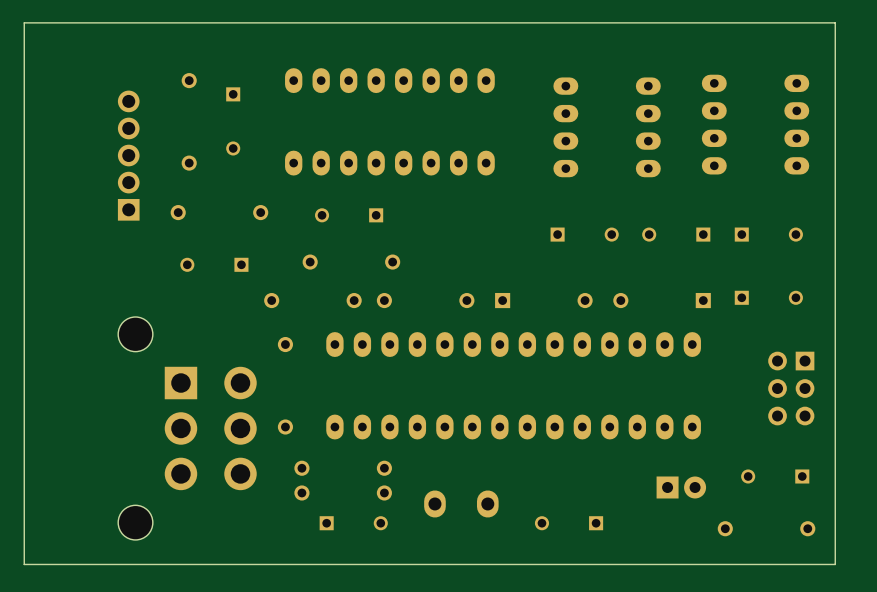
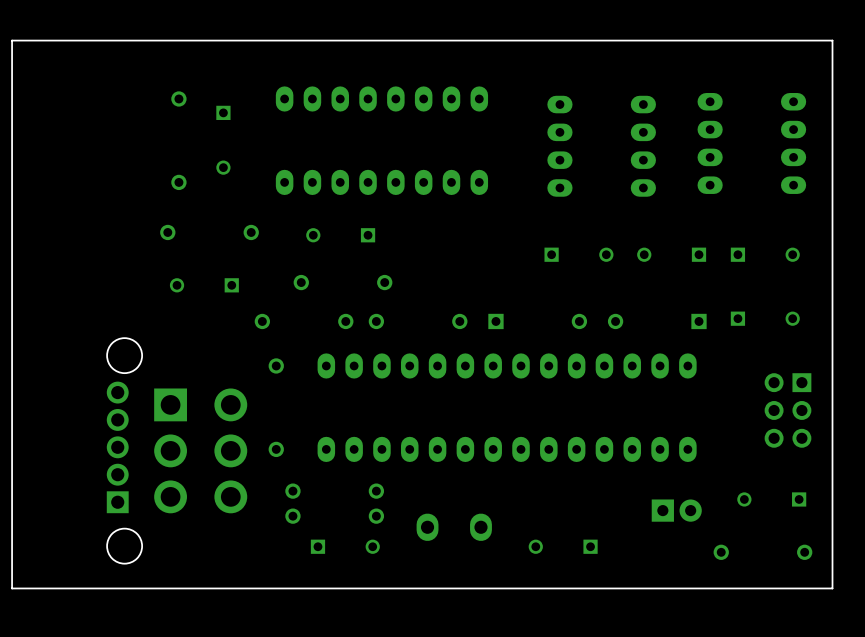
part position: (128, 155) -> (117, 447)

